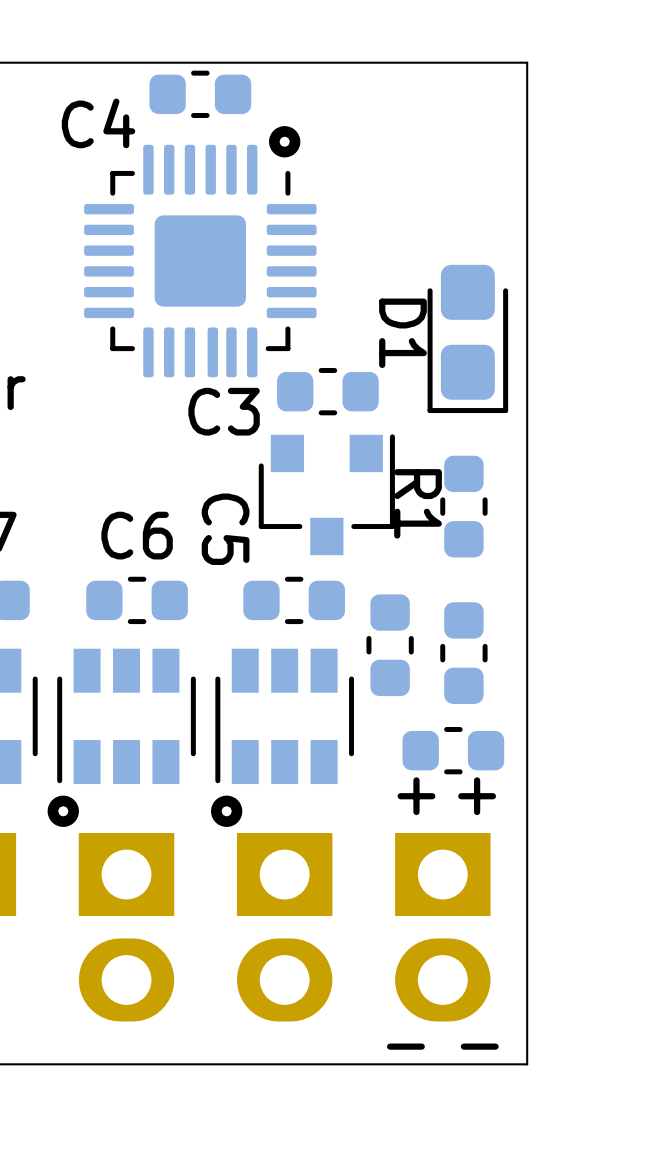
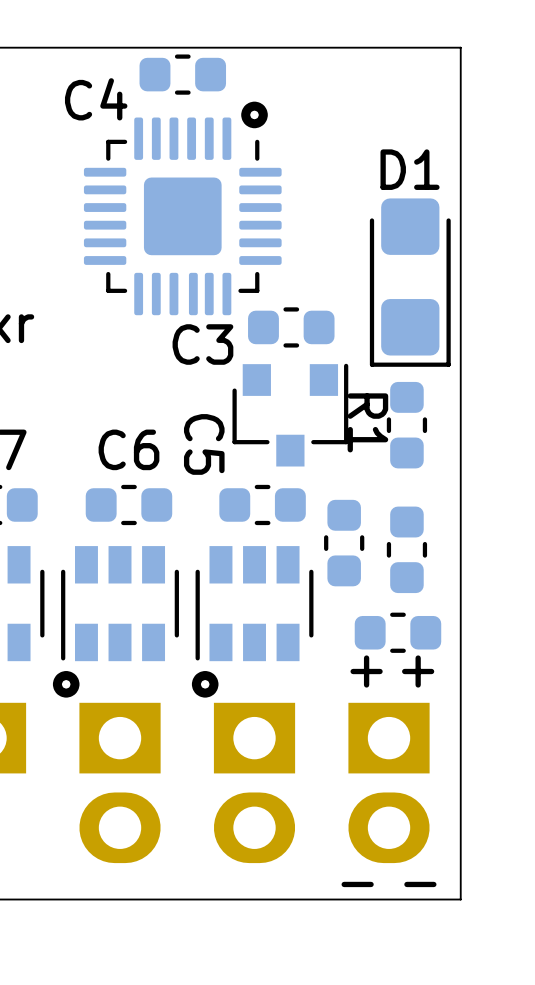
D1 footprint: [427, 264, 509, 414] -> [369, 198, 451, 367]
D1 name rotation: 0° (403, 333) -> 90° counterclockwise (410, 169)
D1 name position: D1 (403, 333) -> D1 (410, 169)

